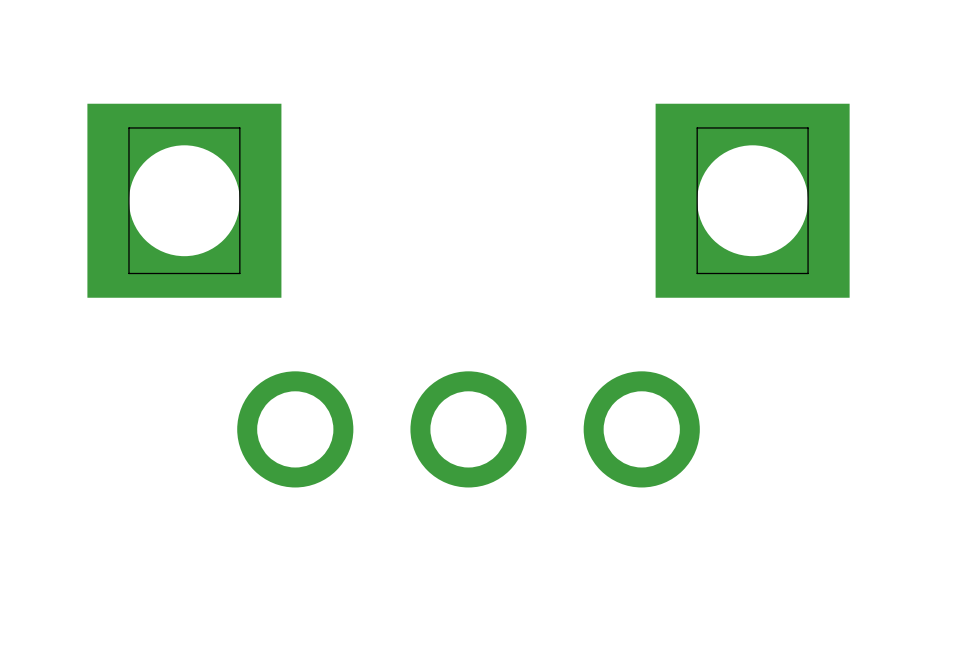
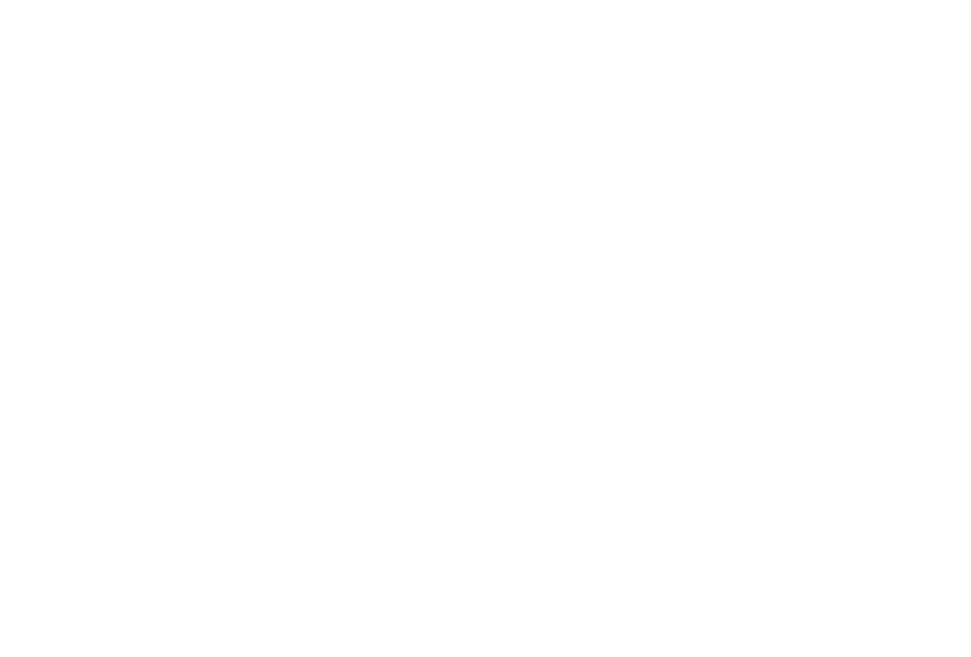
part: (468, 295) -> none

